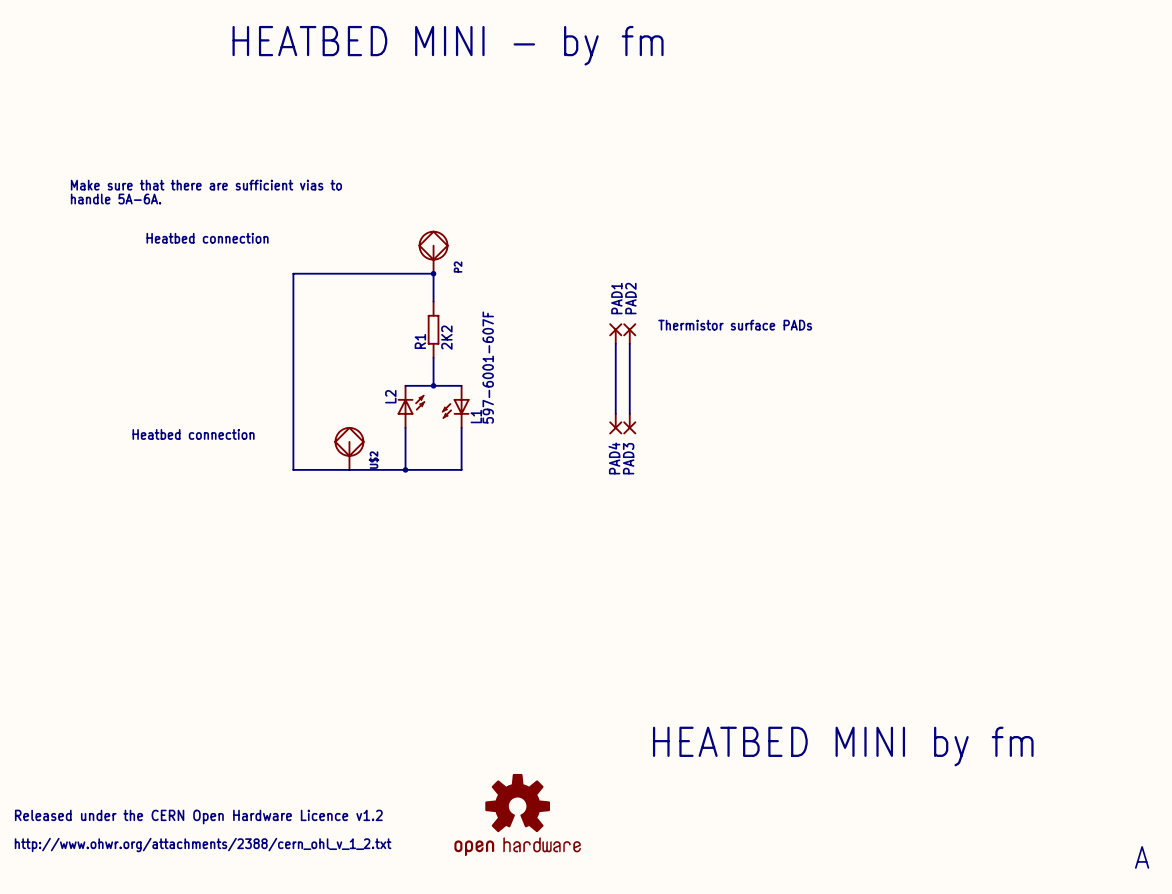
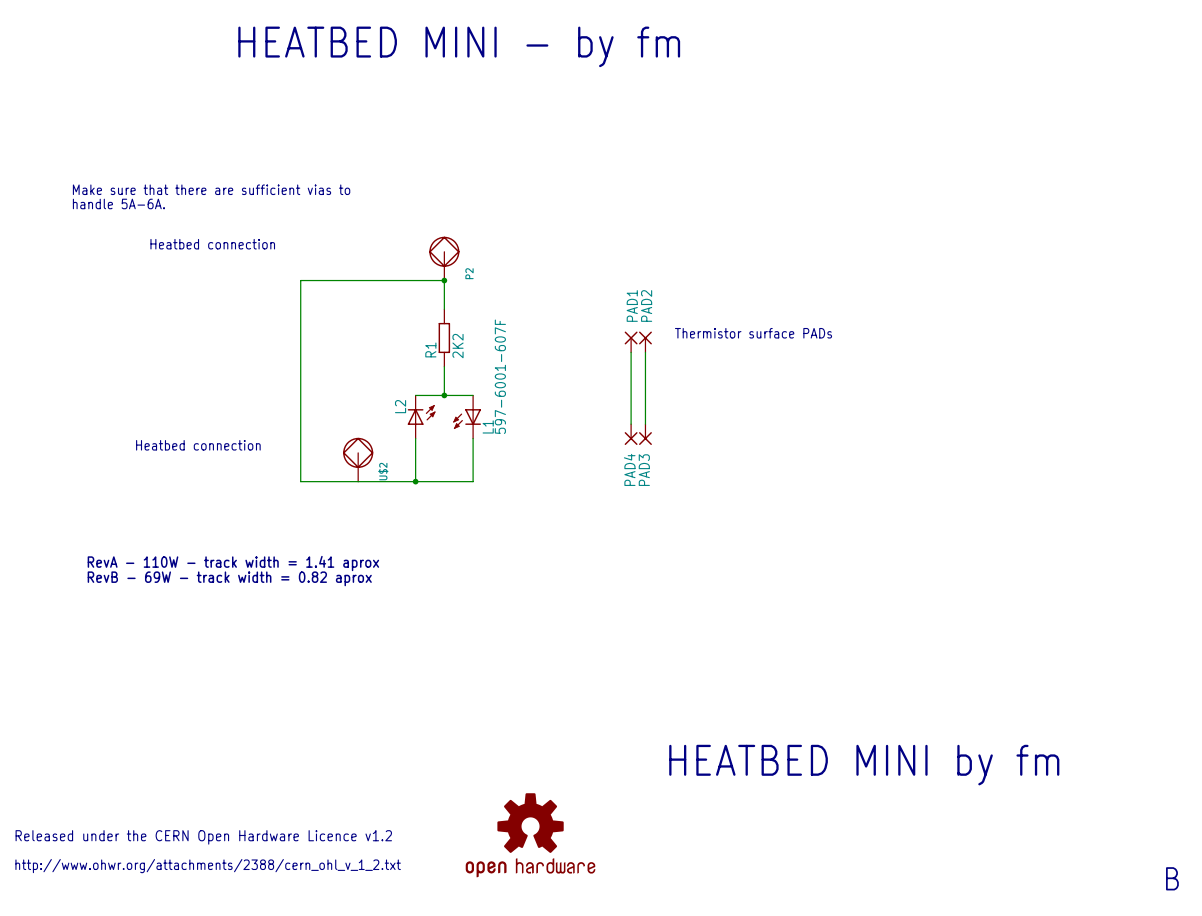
text: none -> RevA - 110W - track width = 1.41 aprox (233, 563)
text: none -> RevB - 69W - track width = 0.82 aprox (229, 578)
text: A (1142, 857) -> B (1172, 878)

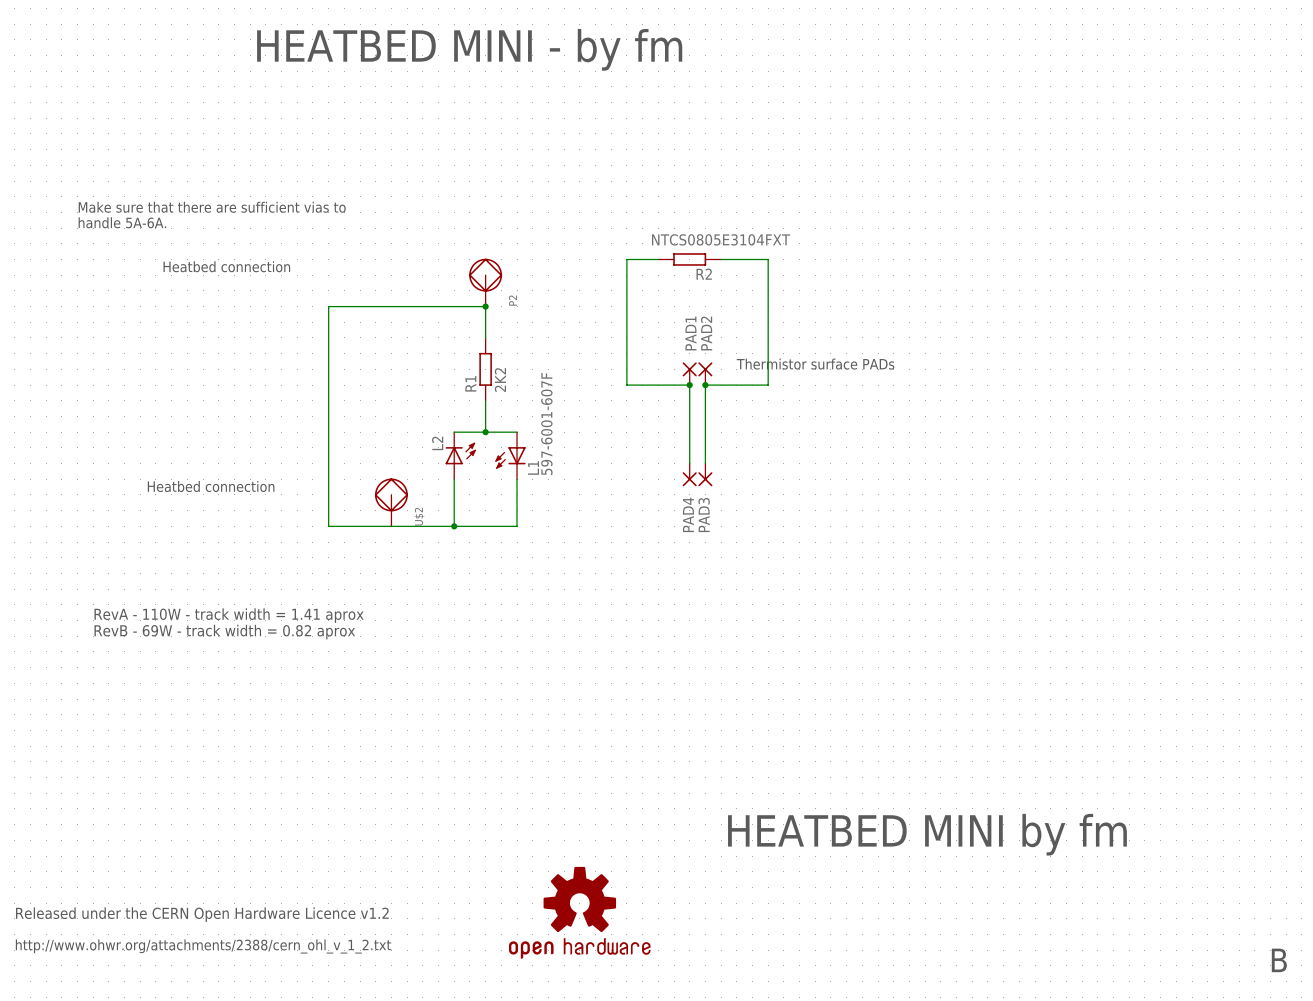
wire: none -> (658, 259) (626, 259) (626, 385) (689, 385)
R2: none -> NTCS0805E3104FXT (689, 259)
wire: none -> (721, 259) (768, 259) (768, 385) (705, 385)
junction: none -> (689, 385)
junction: none -> (705, 385)

